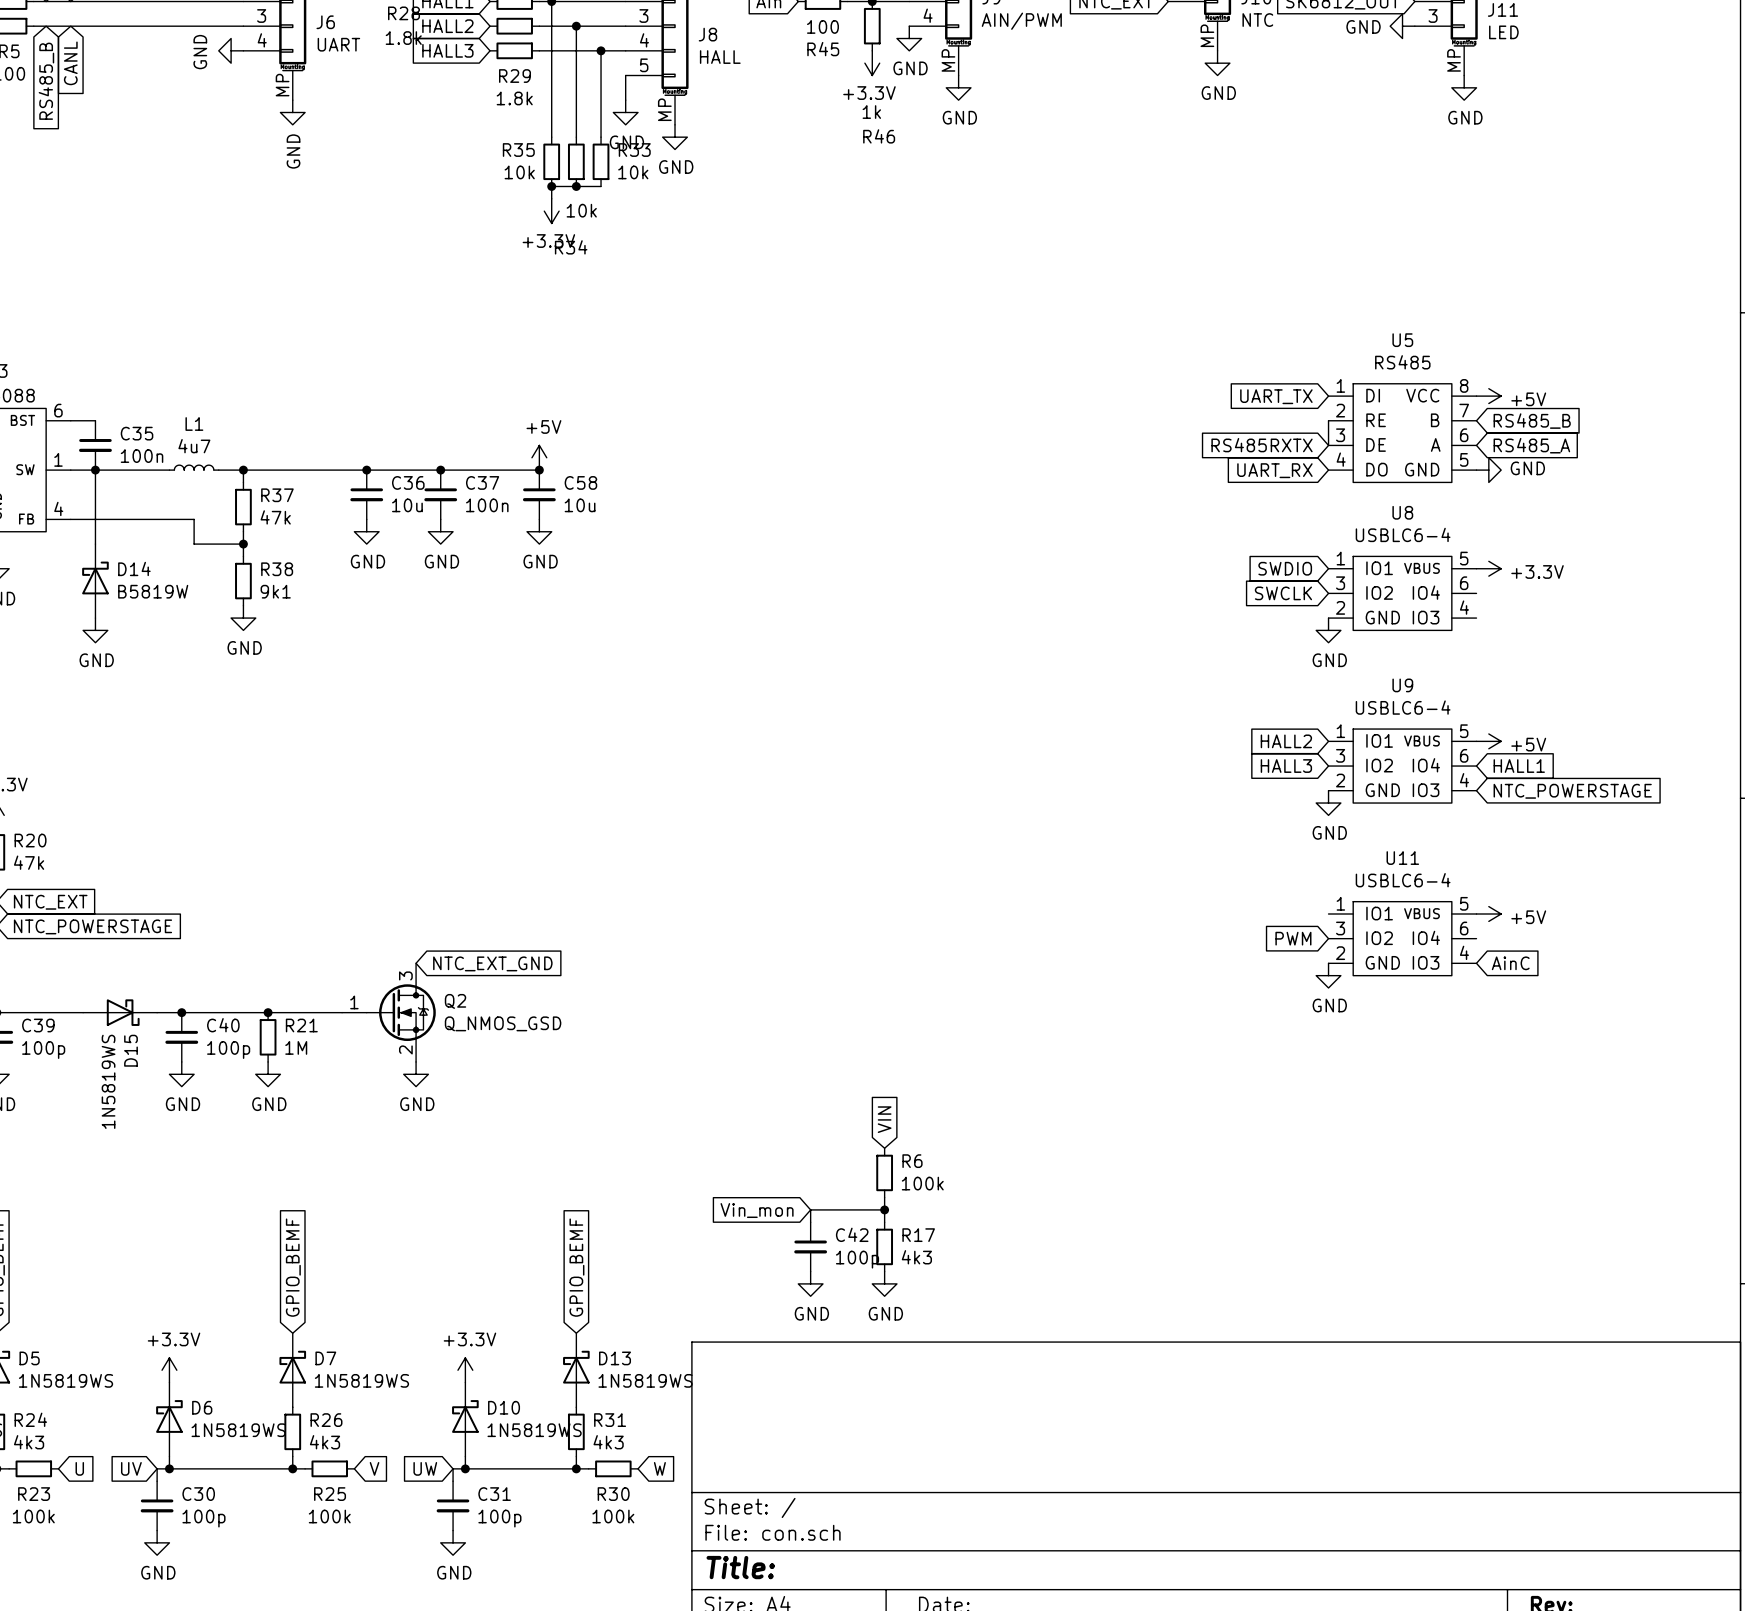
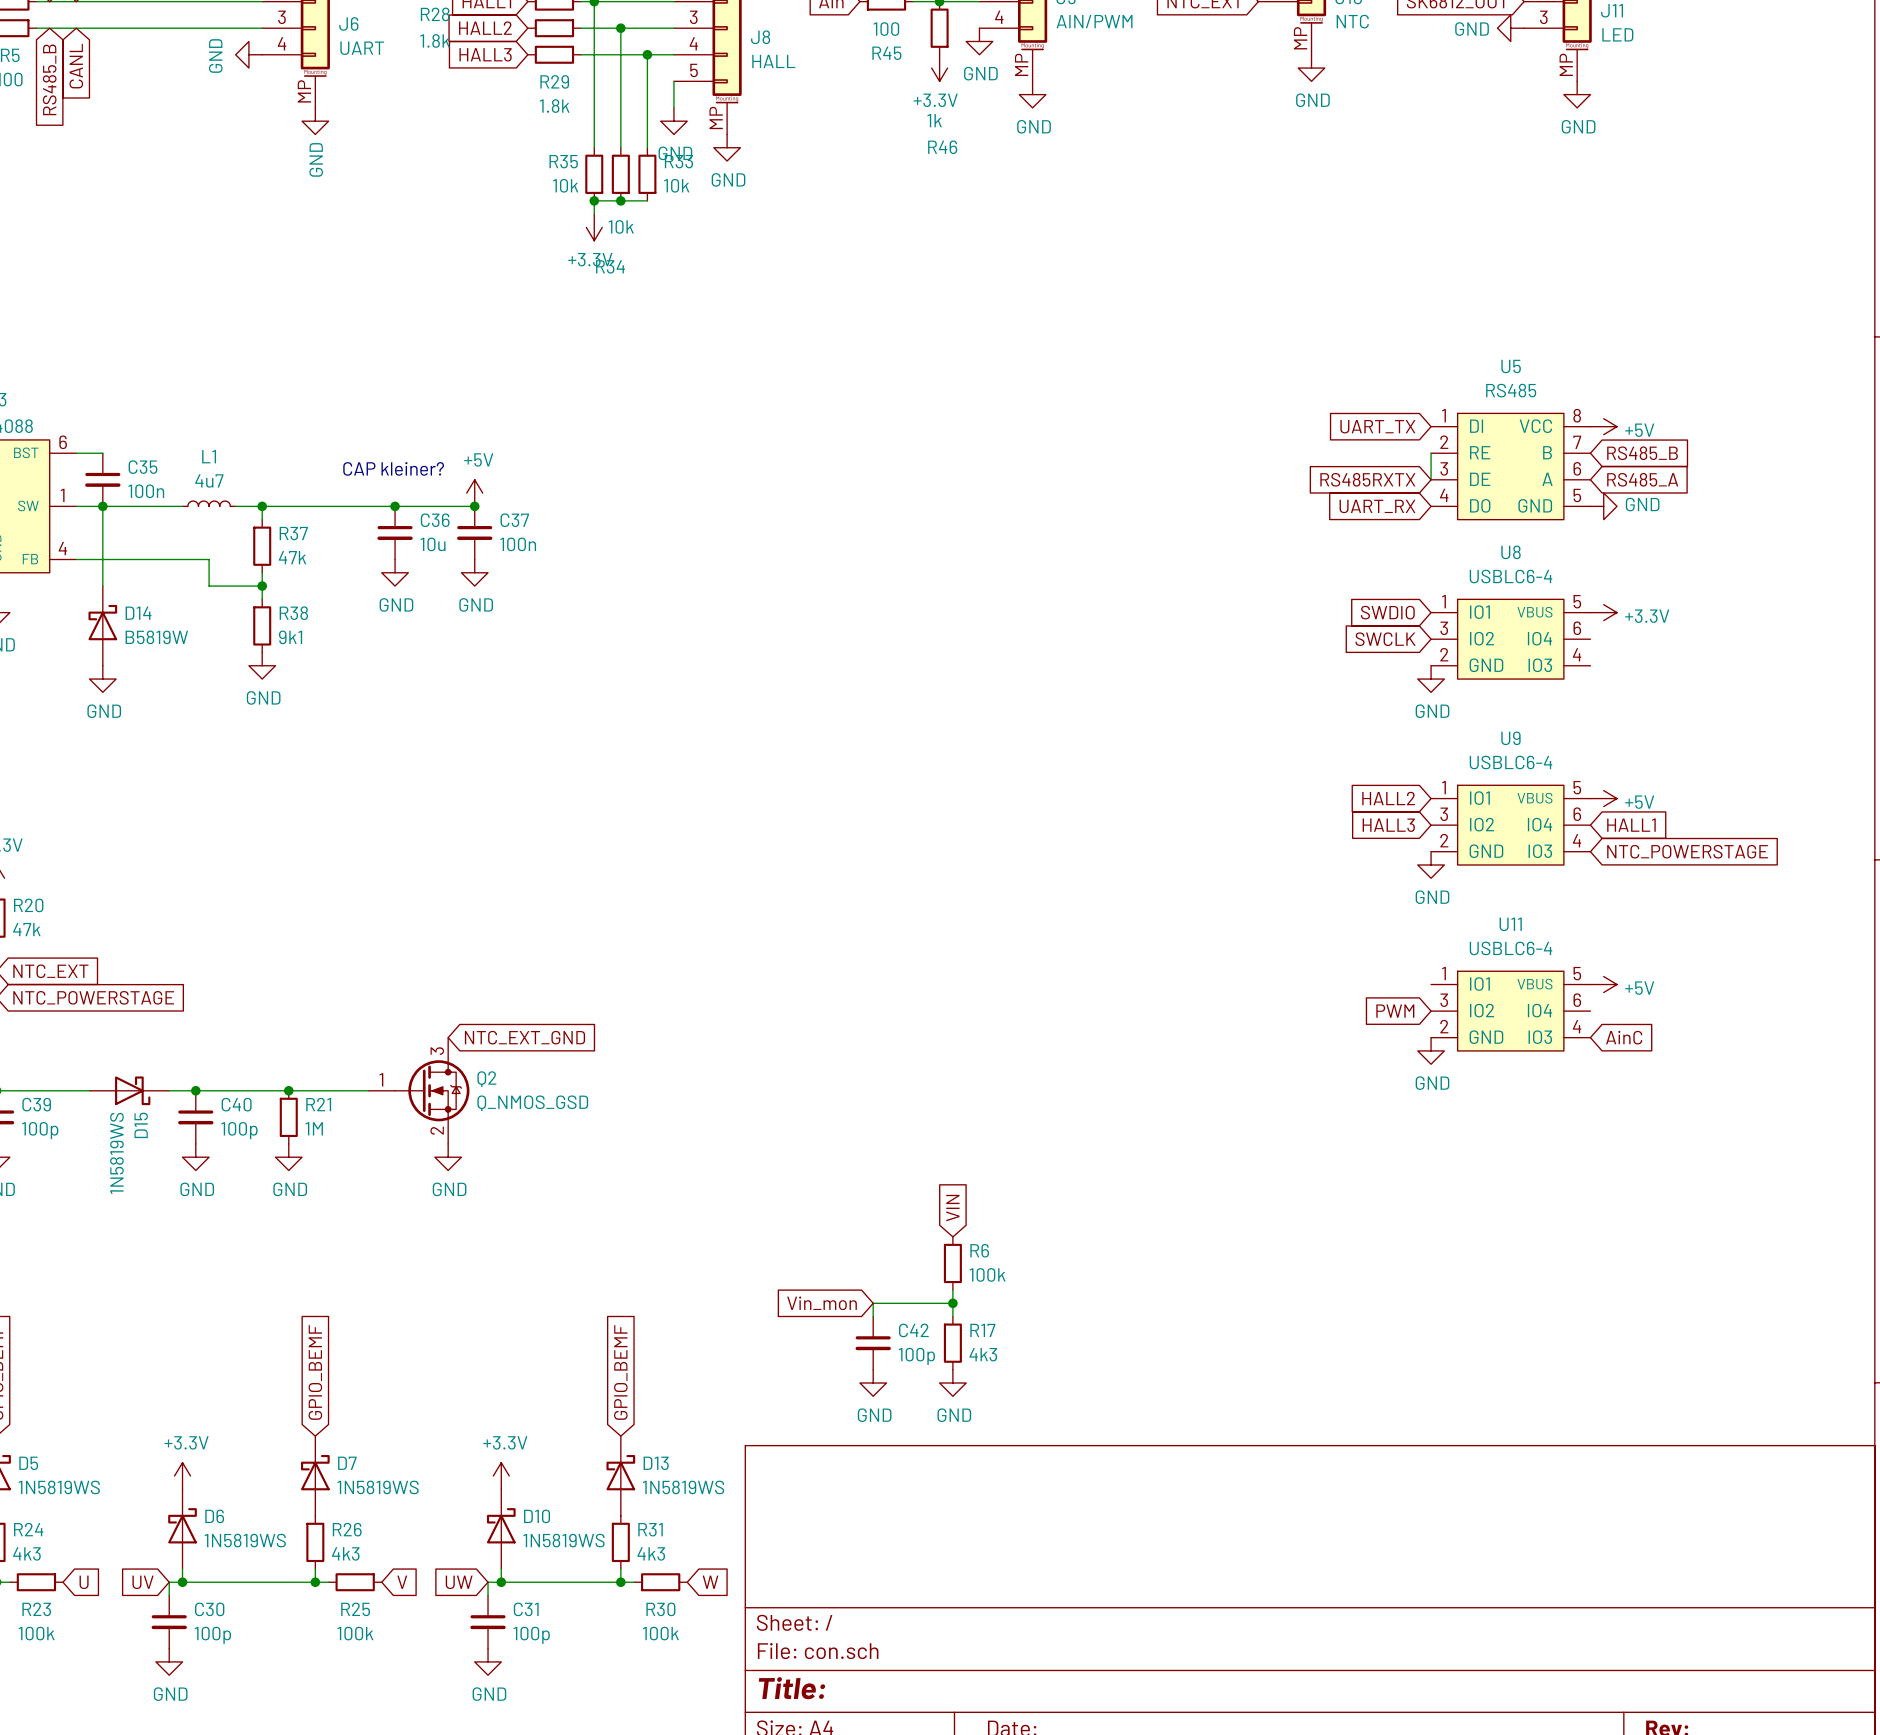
text: none -> CAP kleiner? (393, 468)
power symbol position: +5V (539, 457) -> +5V (474, 493)
wire: (440, 470) (539, 470) -> none
junction: (539, 470) -> none
C58: 10u (539, 494) -> none
power symbol: GND (539, 531) -> none

